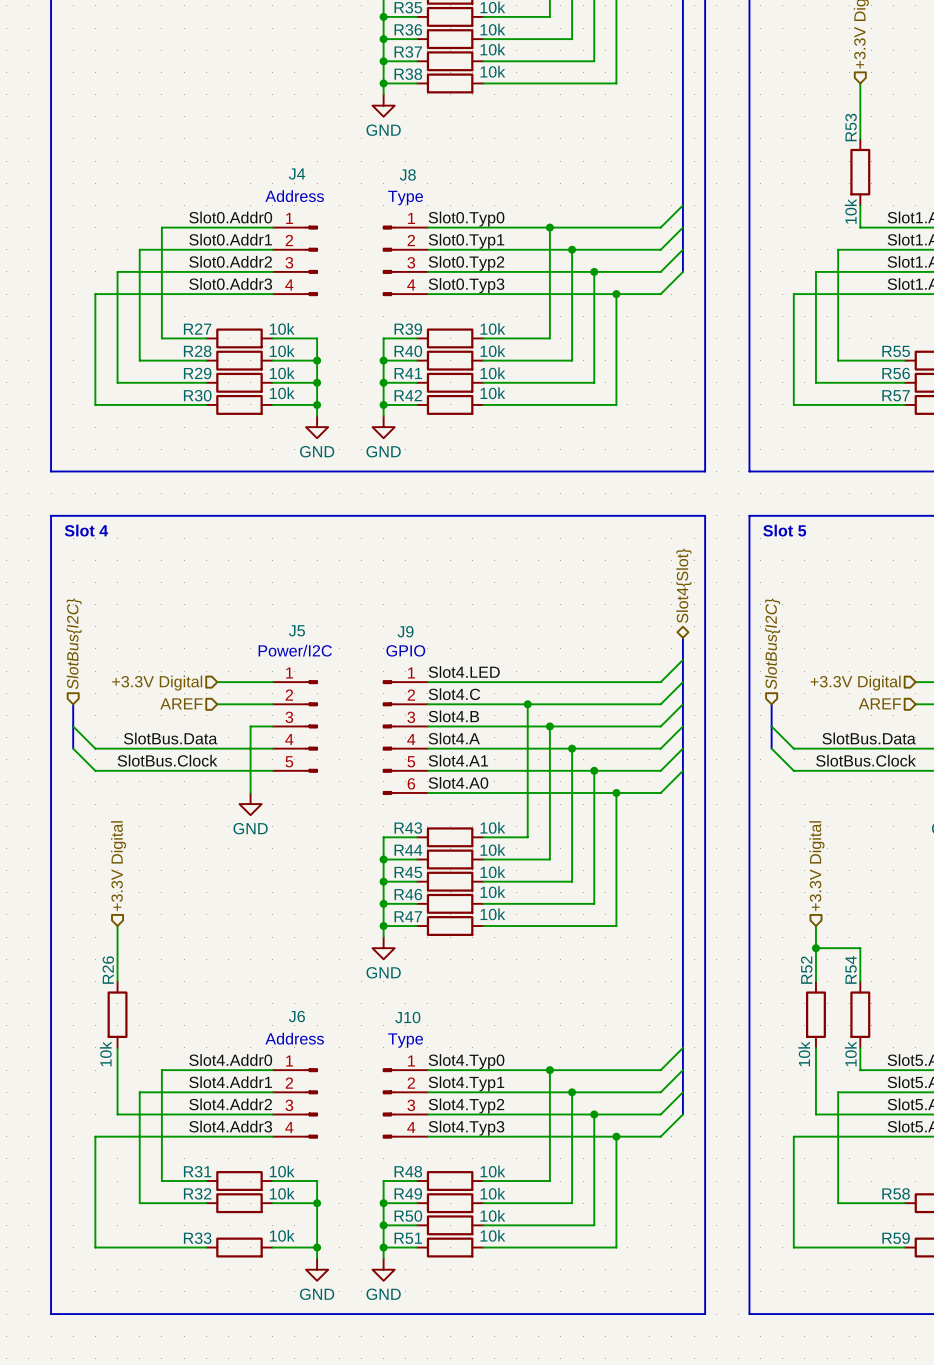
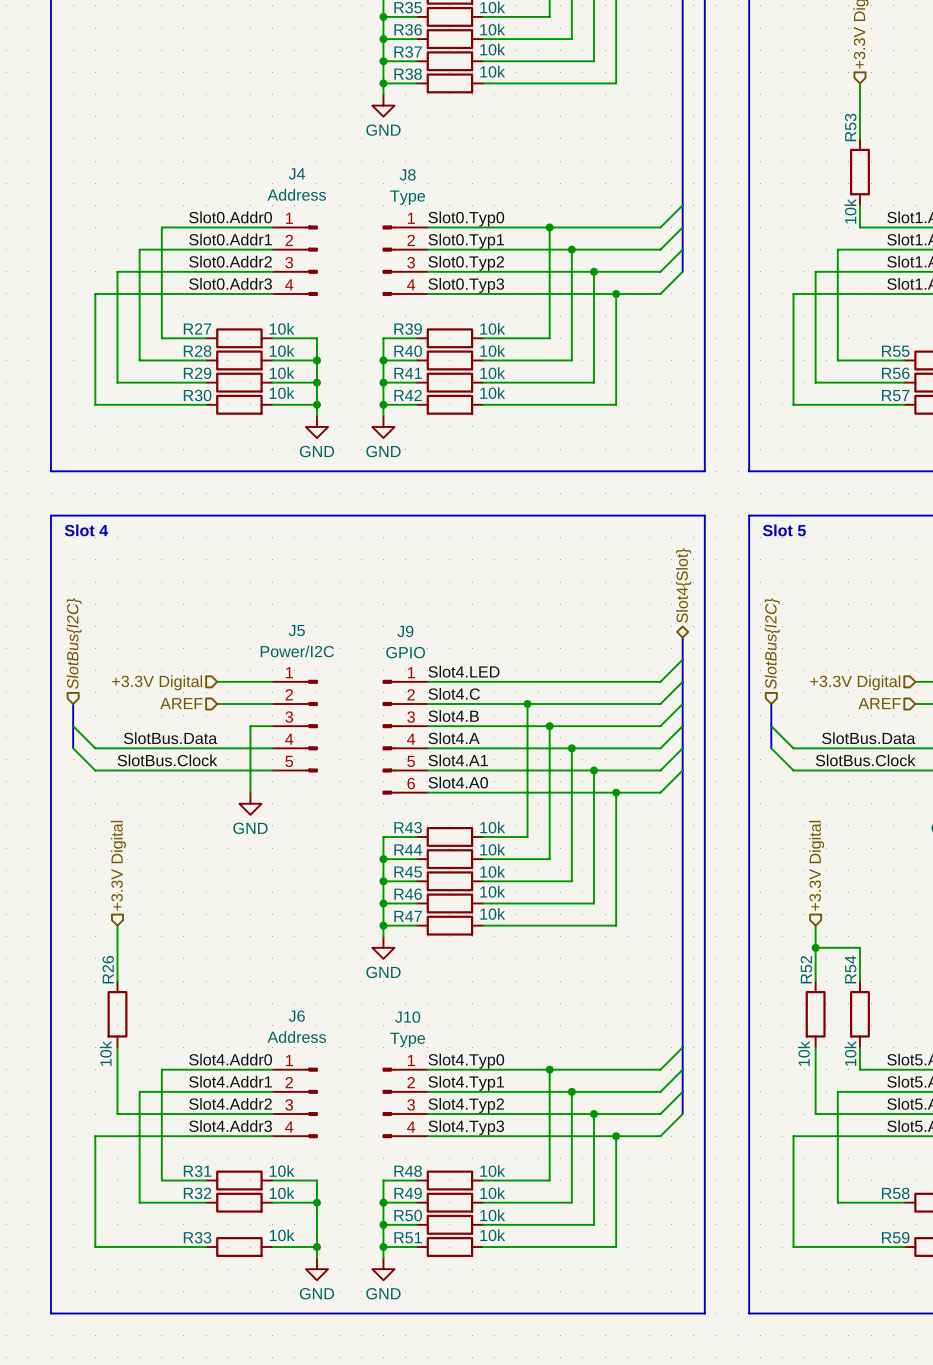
J4 value: none -> Address (296, 194)
text: Address (294, 196) -> none
J8 value: none -> Type (407, 197)
text: Type (405, 198) -> none
text: Power/I2C (295, 650) -> none
text: GPIO (405, 650) -> none
J5 value: none -> Power/I2C (297, 651)
J9 value: none -> GPIO (405, 652)
J6 value: none -> Address (296, 1037)
text: Address (294, 1038) -> none
text: Type (405, 1040) -> none
J10 value: none -> Type (407, 1039)

